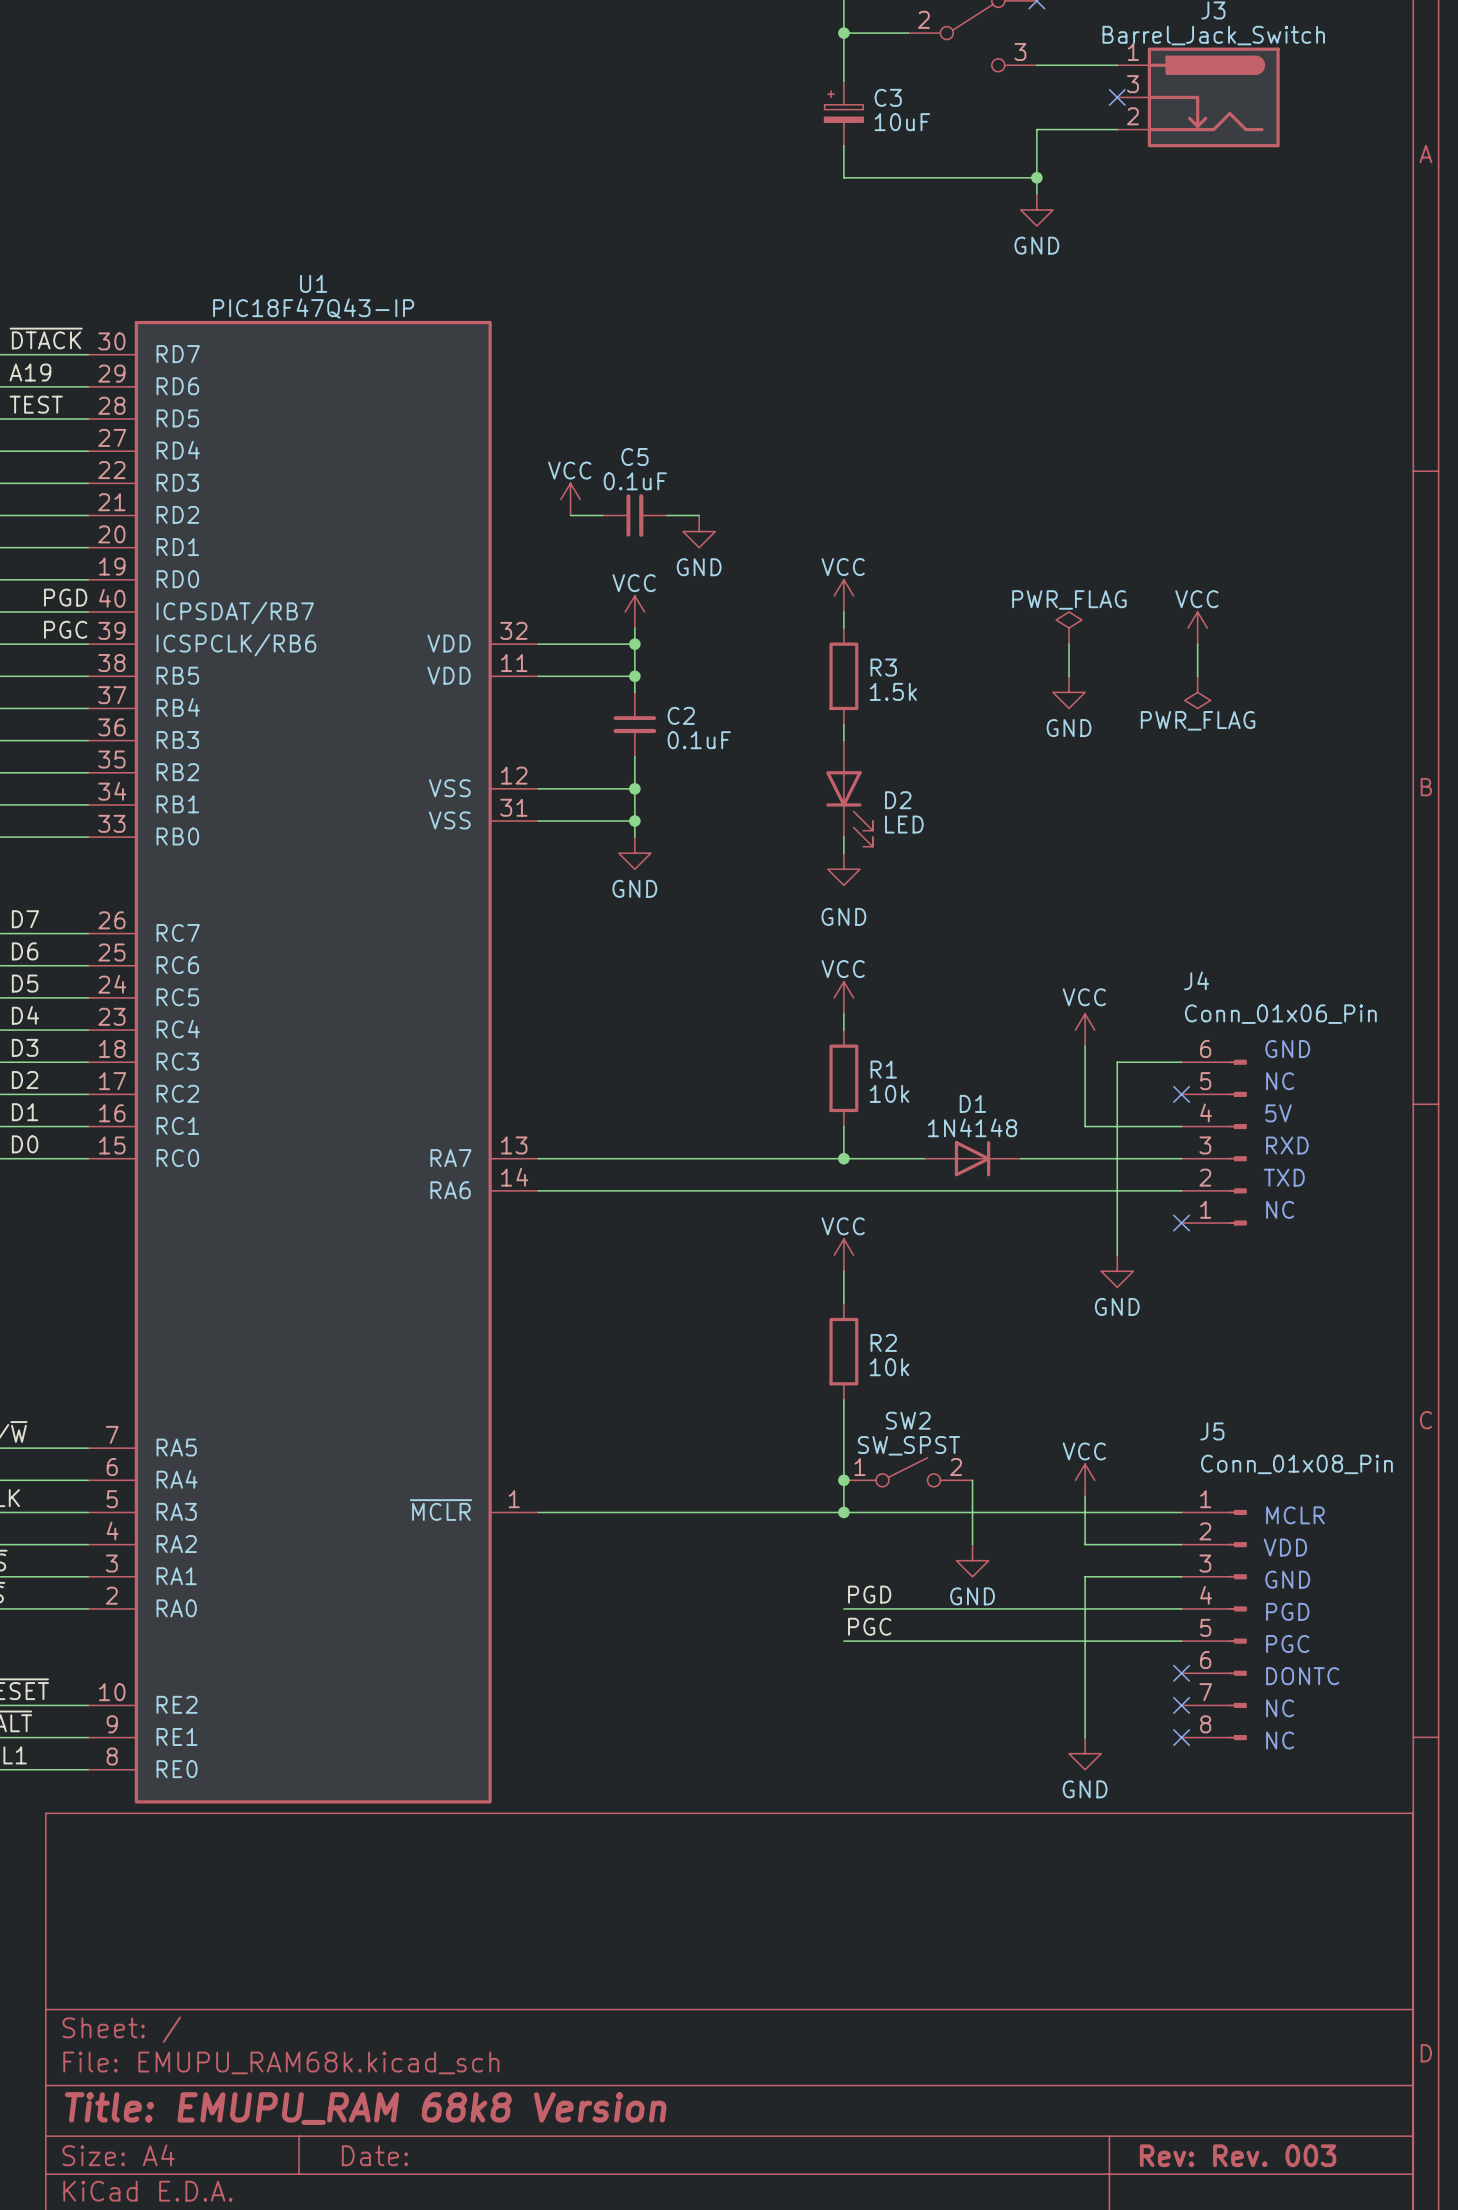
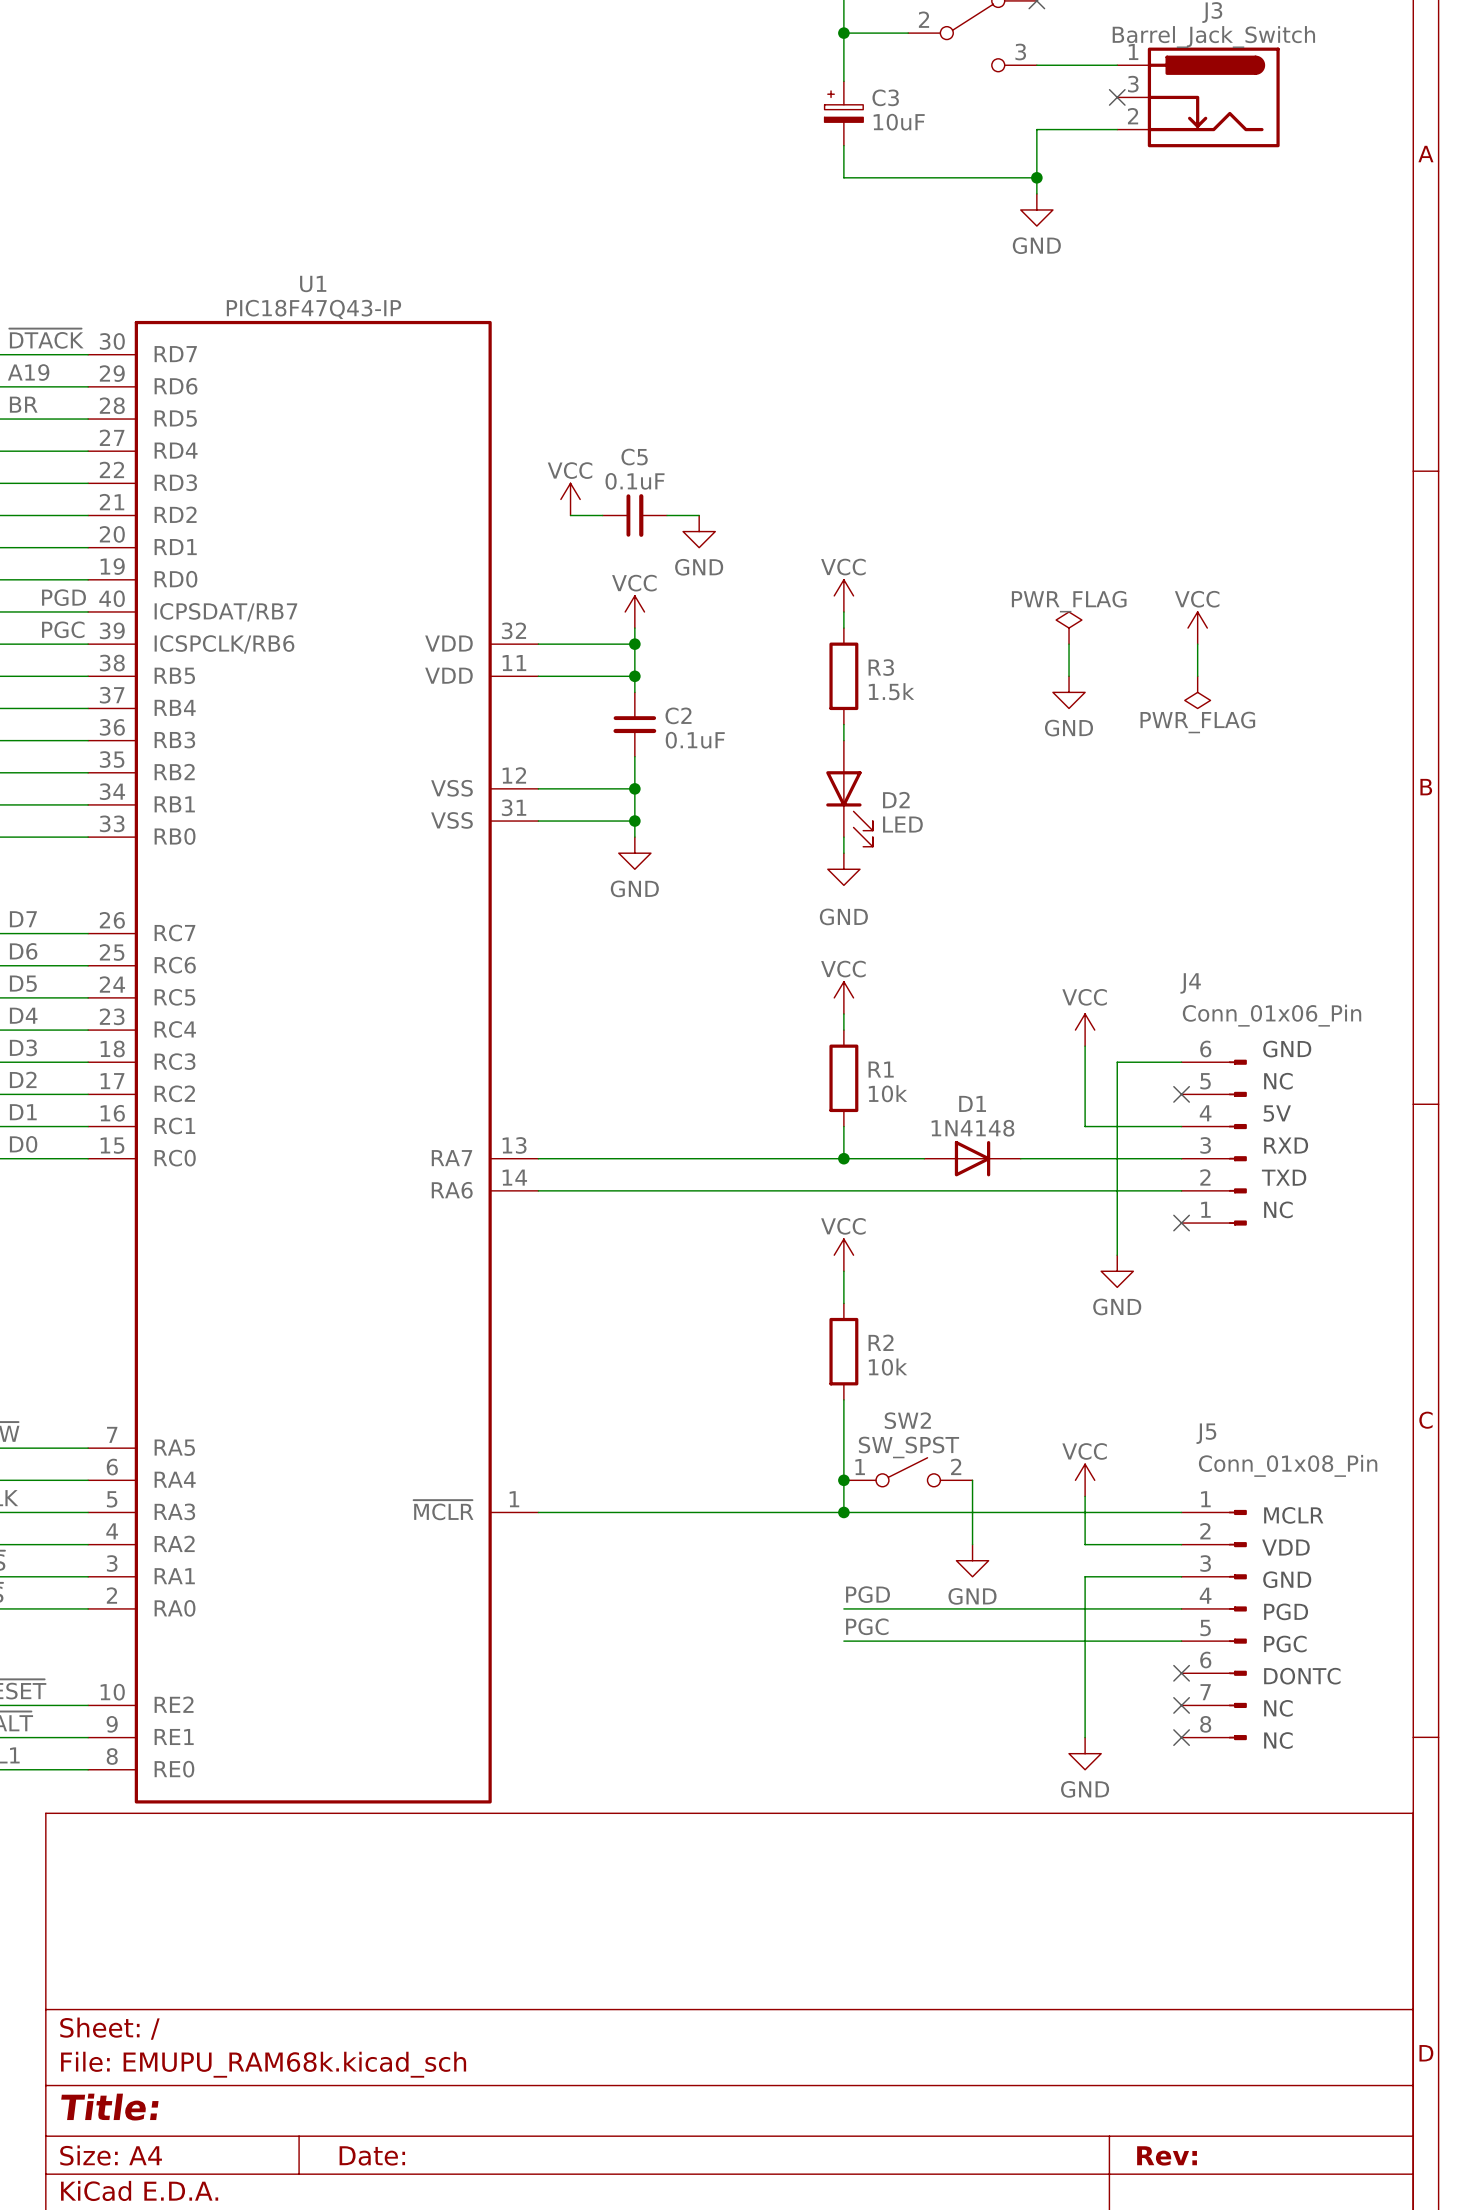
label: TEST (36, 404) -> BR (23, 404)
title block: Title: EMUPU_RAM 68k8 Version (365, 2108) -> Title: (109, 2107)
title block: Rev: Rev. 003 (1238, 2155) -> Rev: (1167, 2155)

